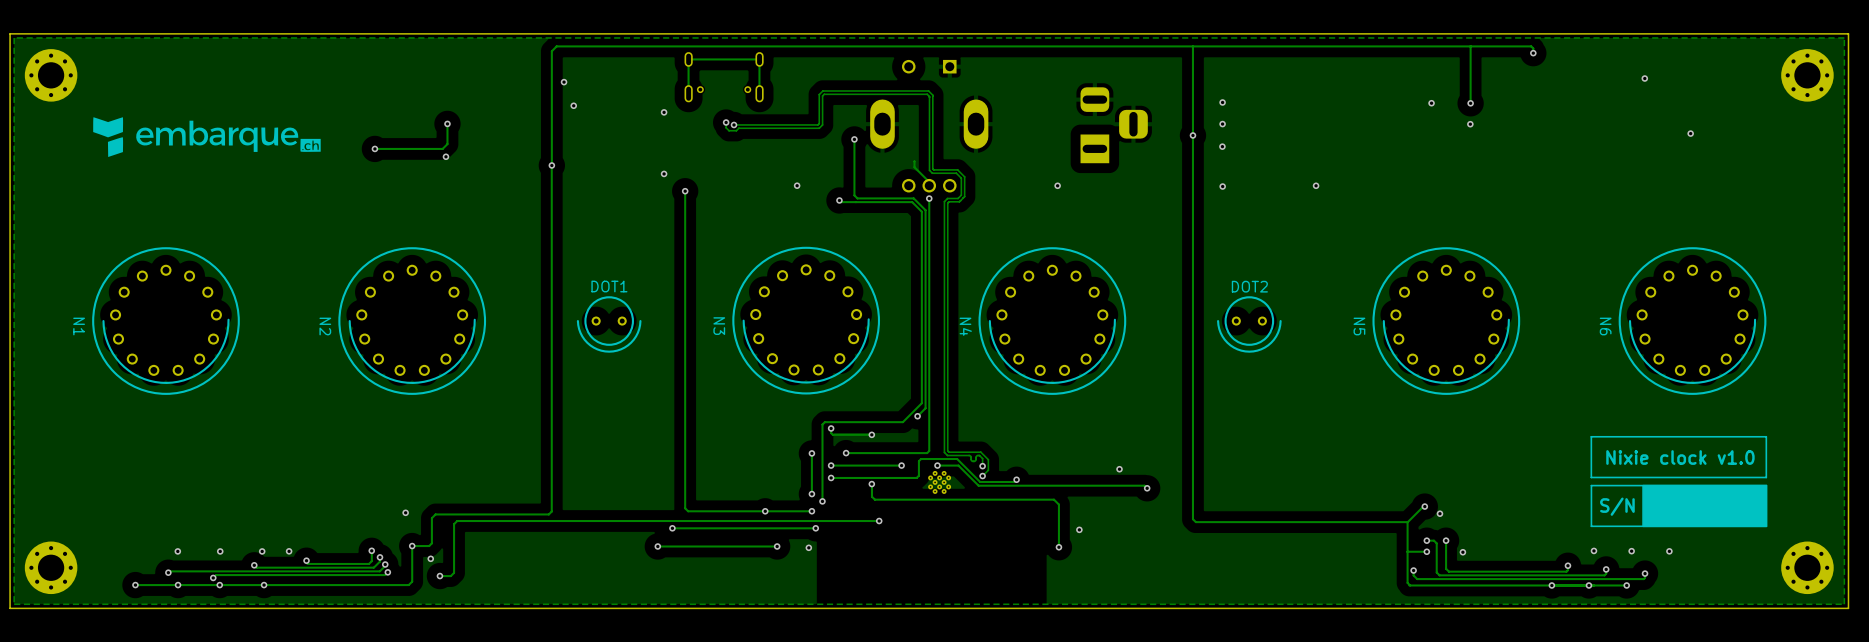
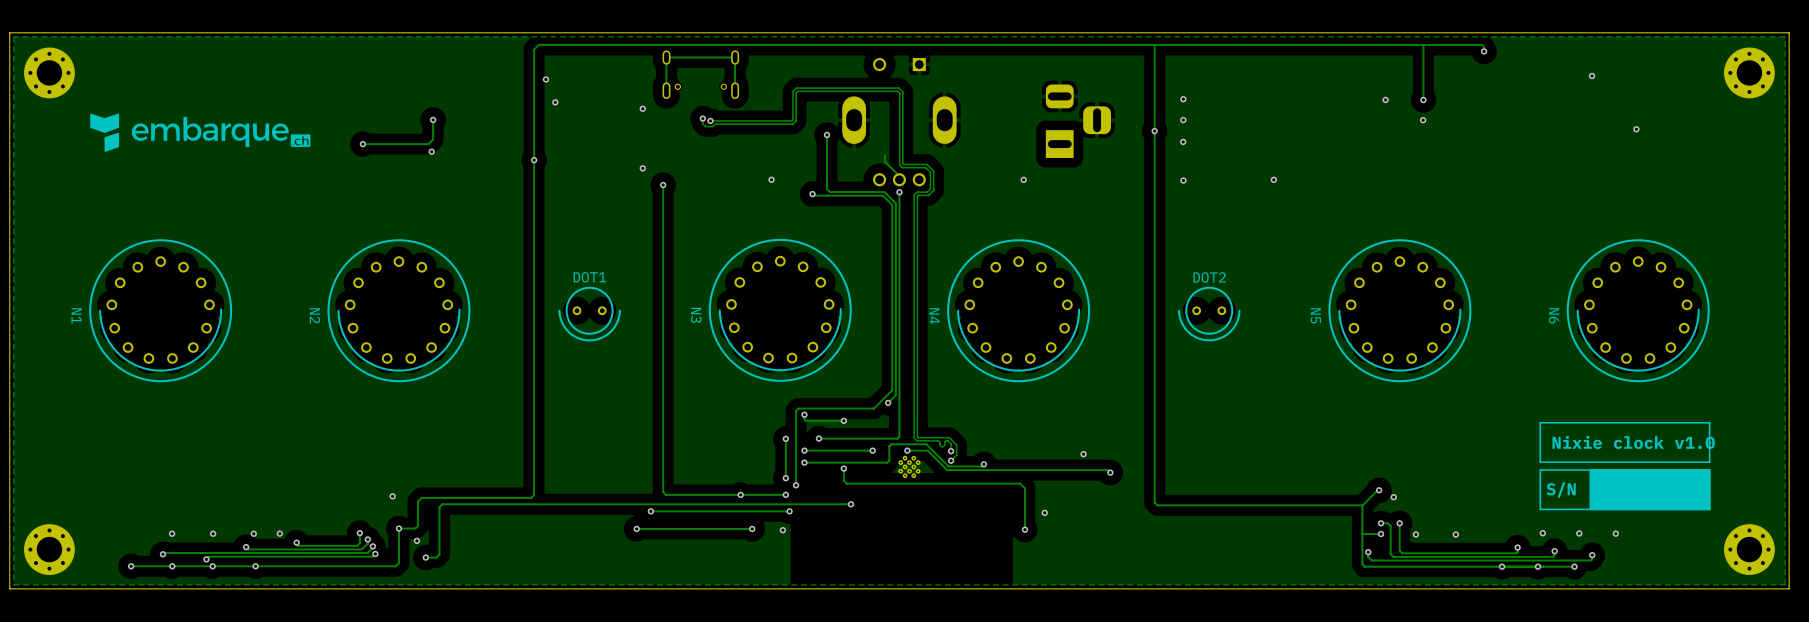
via: none -> (1455, 534)

